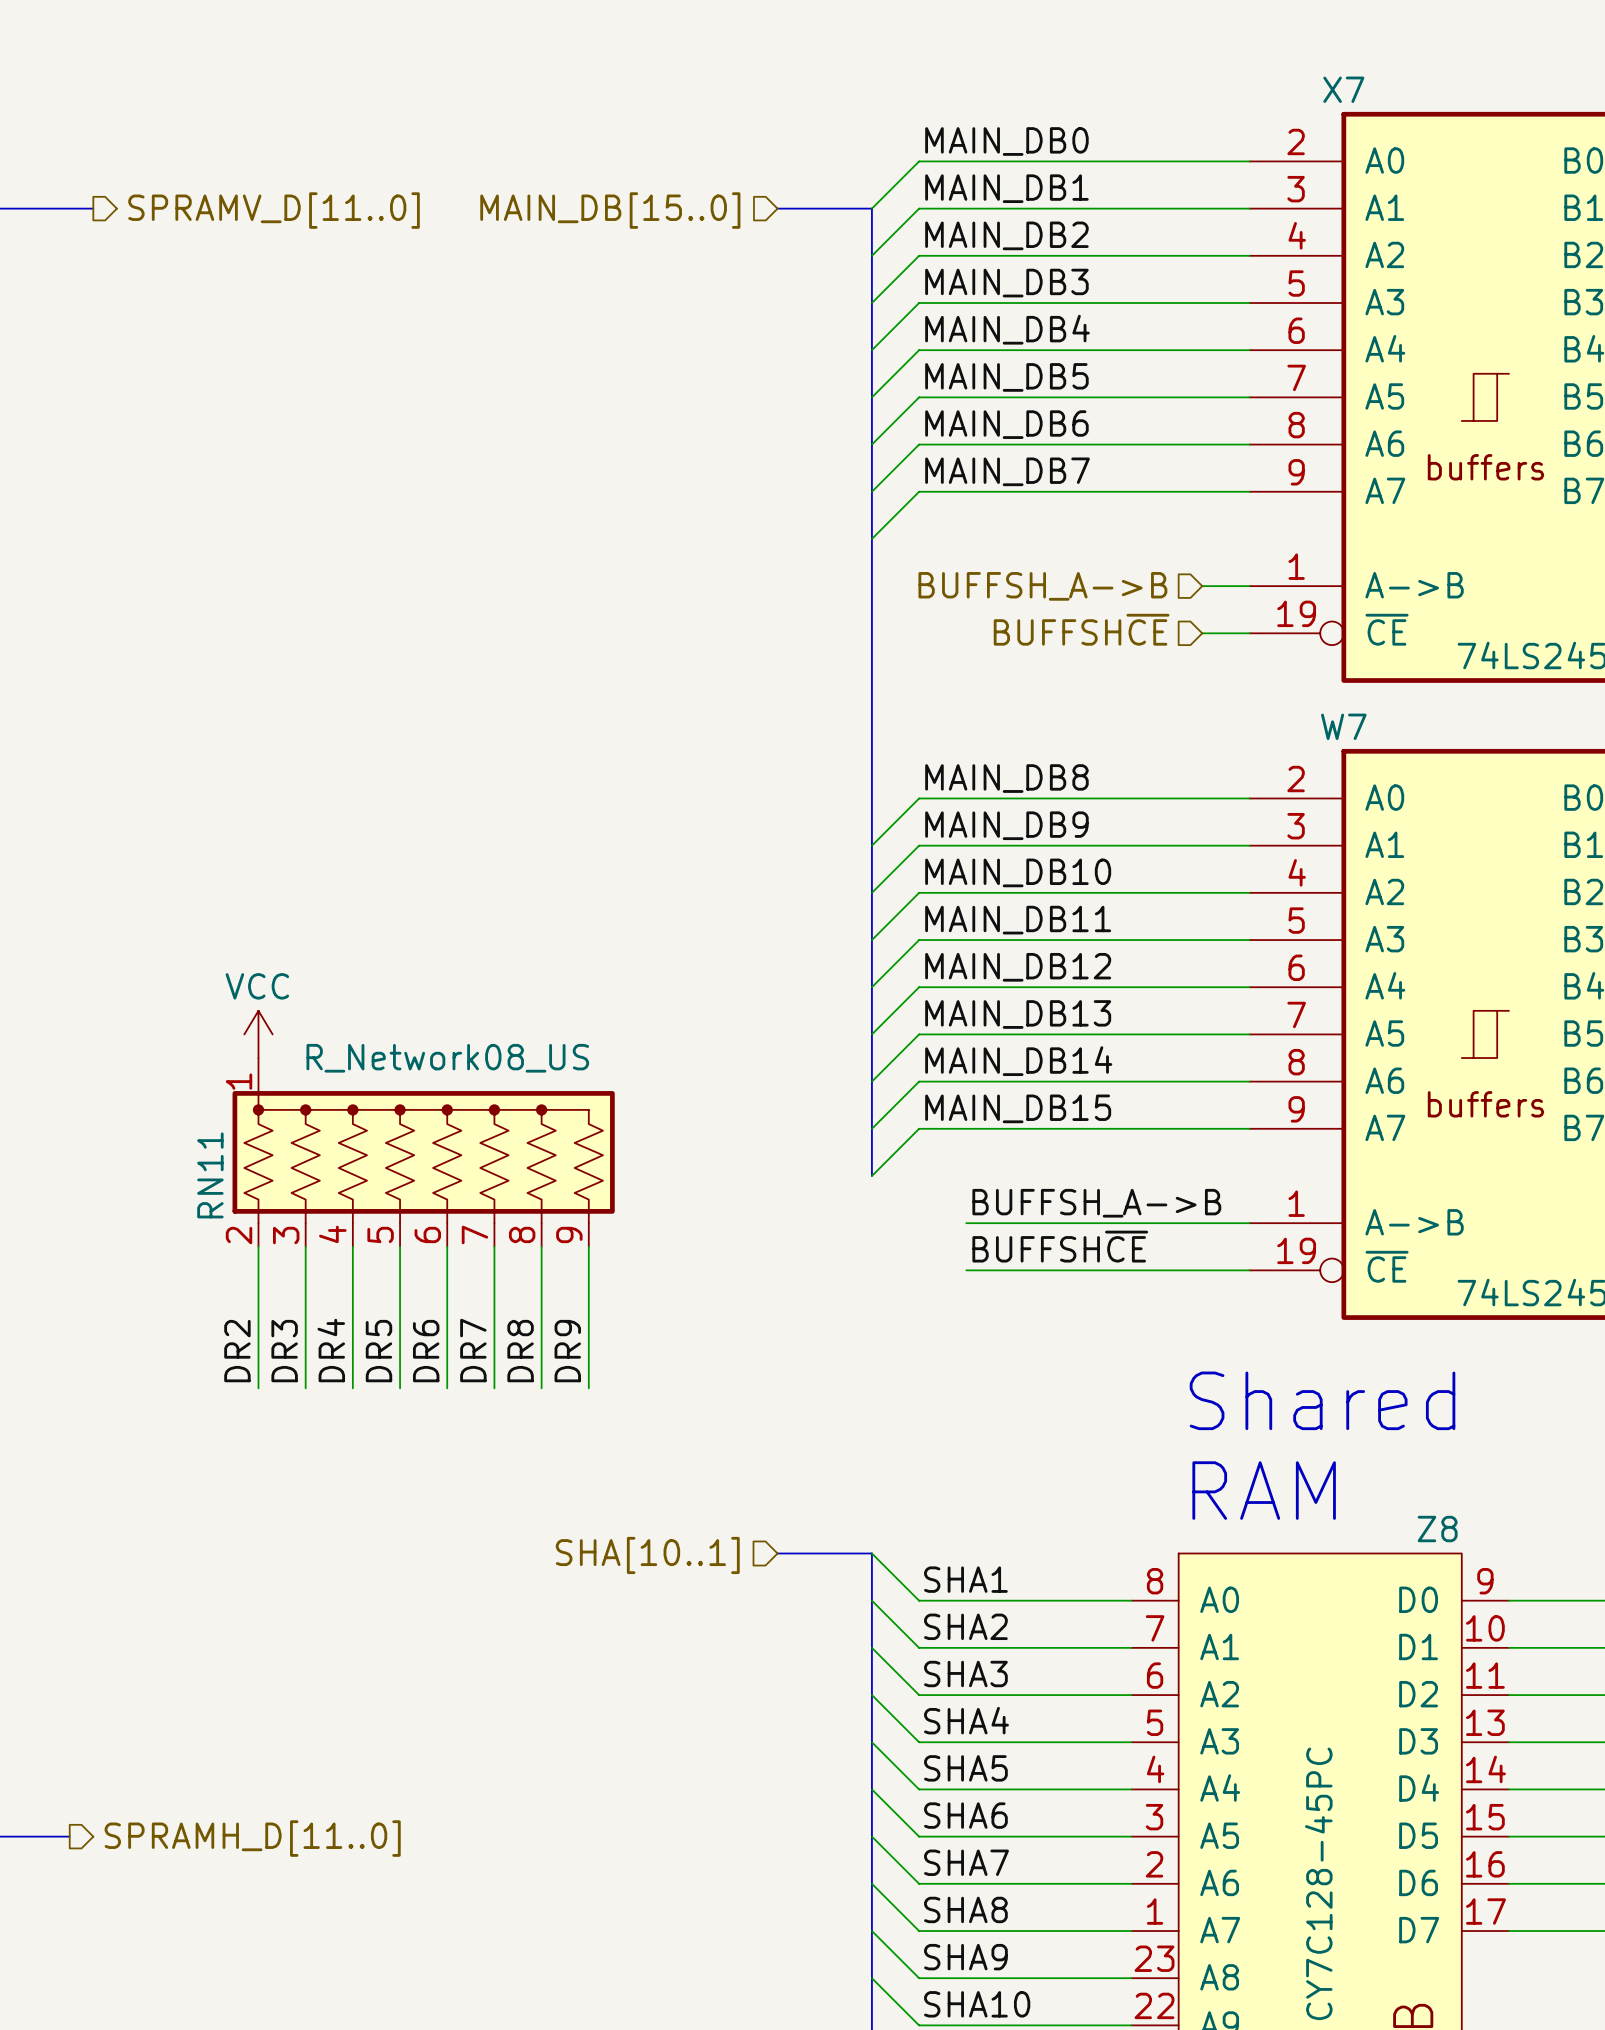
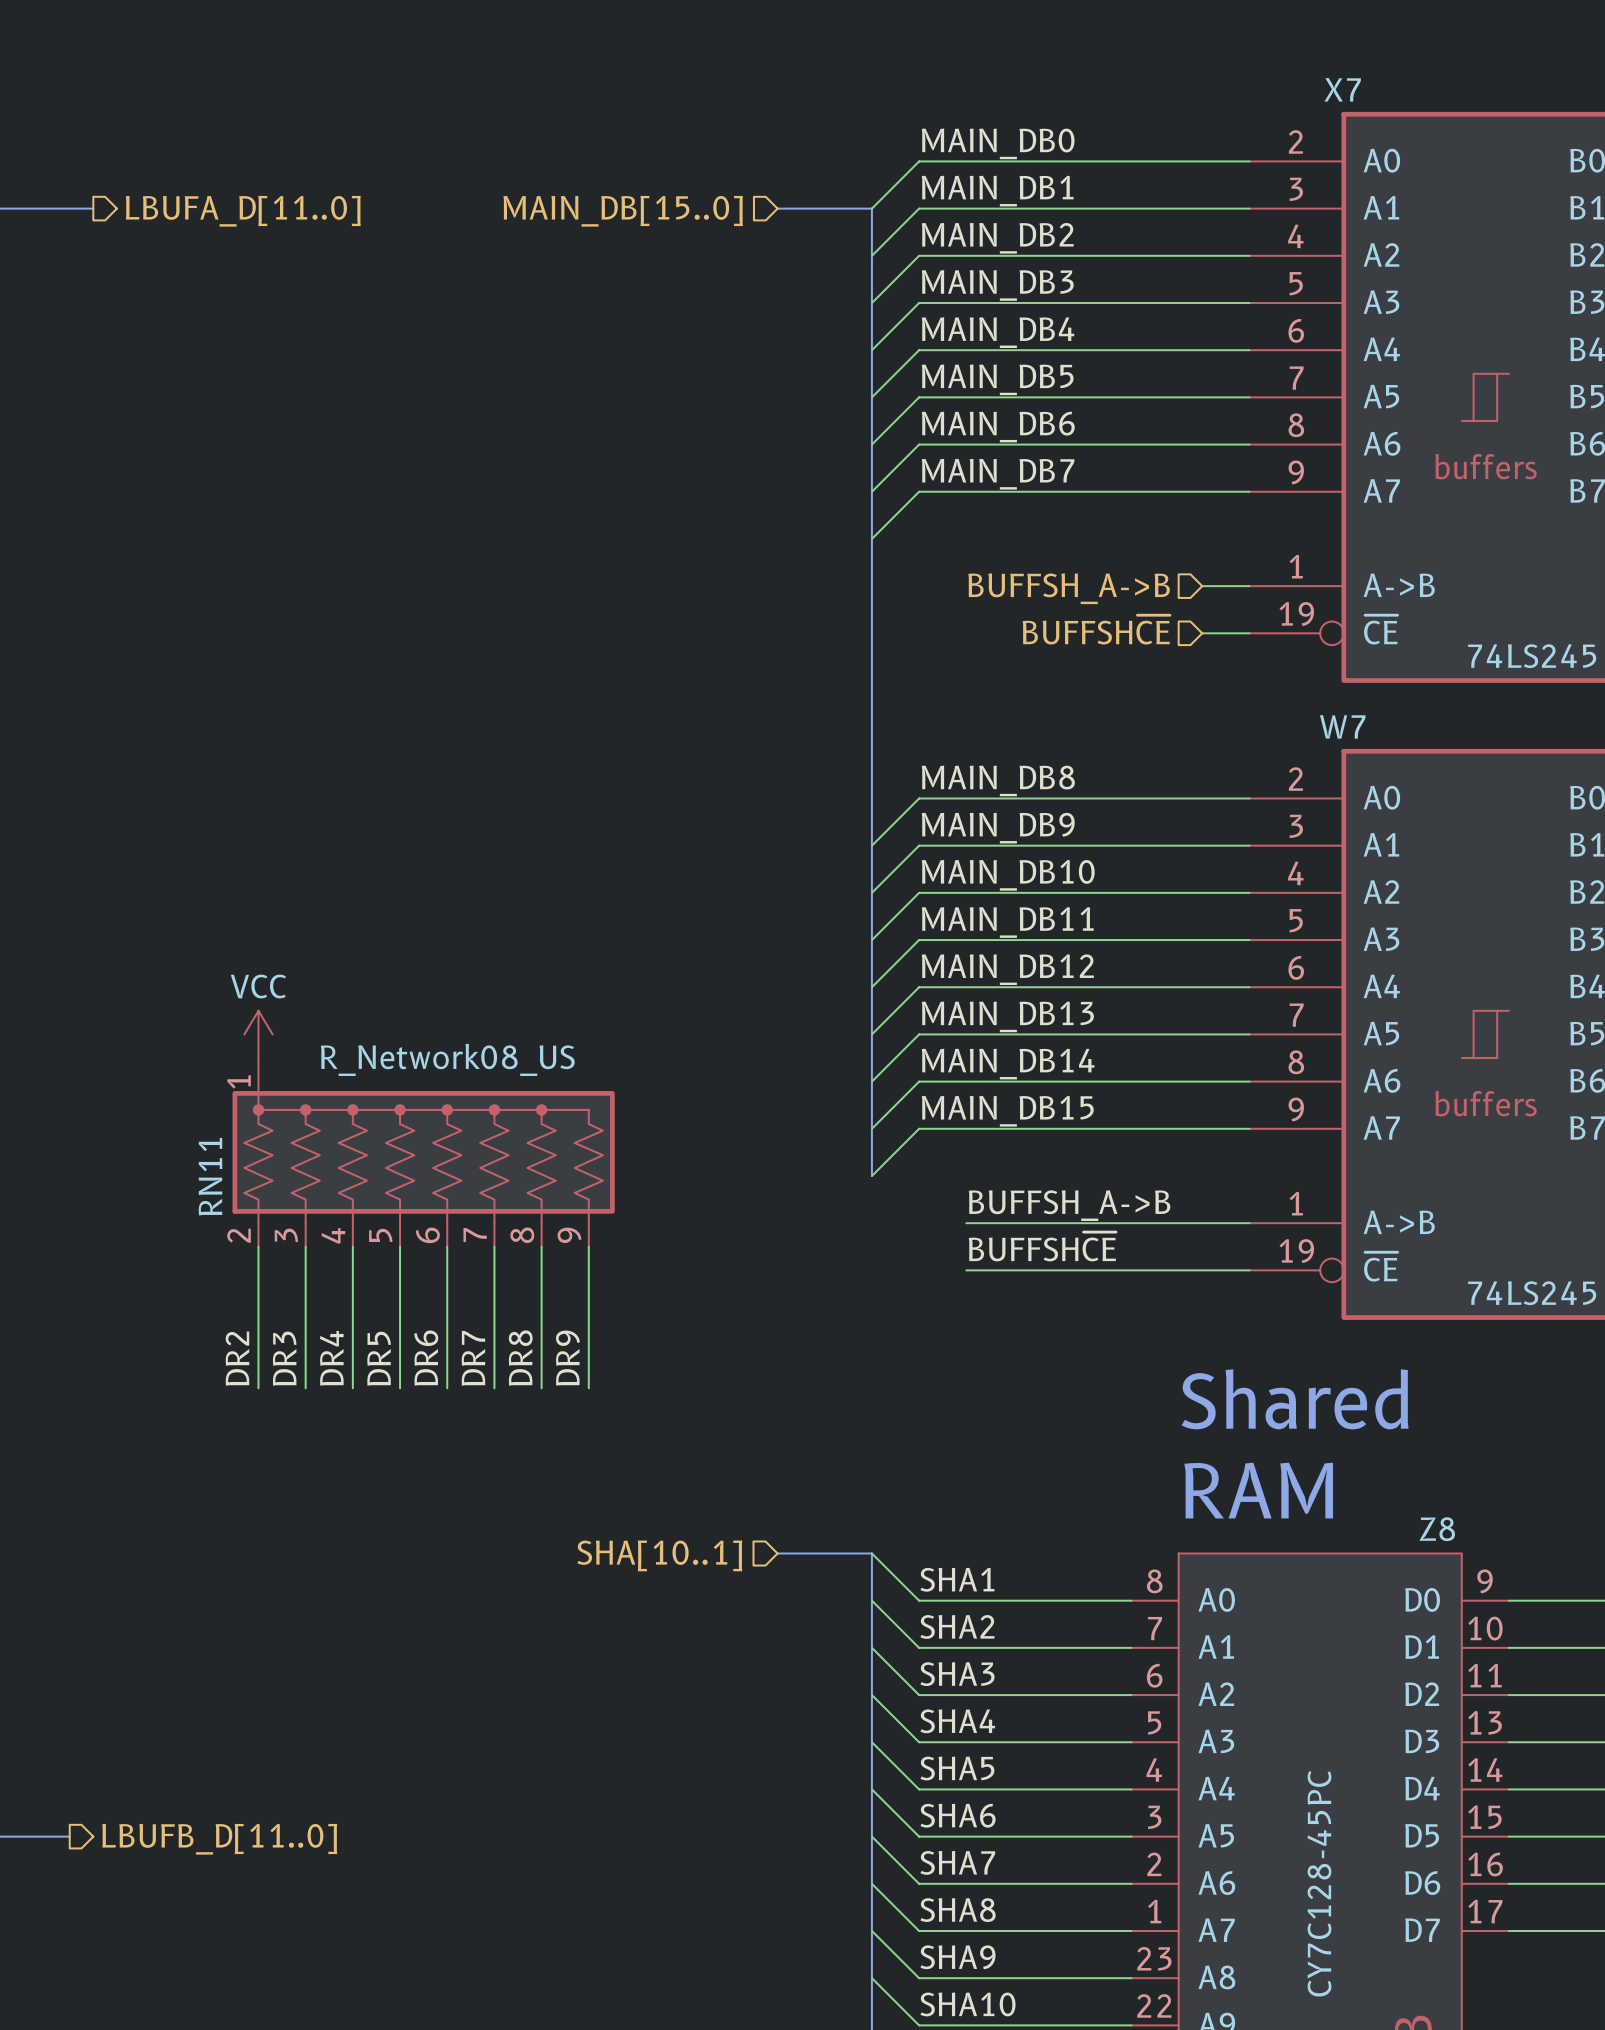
hierarchical label: SPRAMV_D[11..0] (274, 210) -> LBUFA_D[11..0] (243, 211)
hierarchical label: SPRAMH_D[11..0] (252, 1838) -> LBUFB_D[11..0] (219, 1839)

